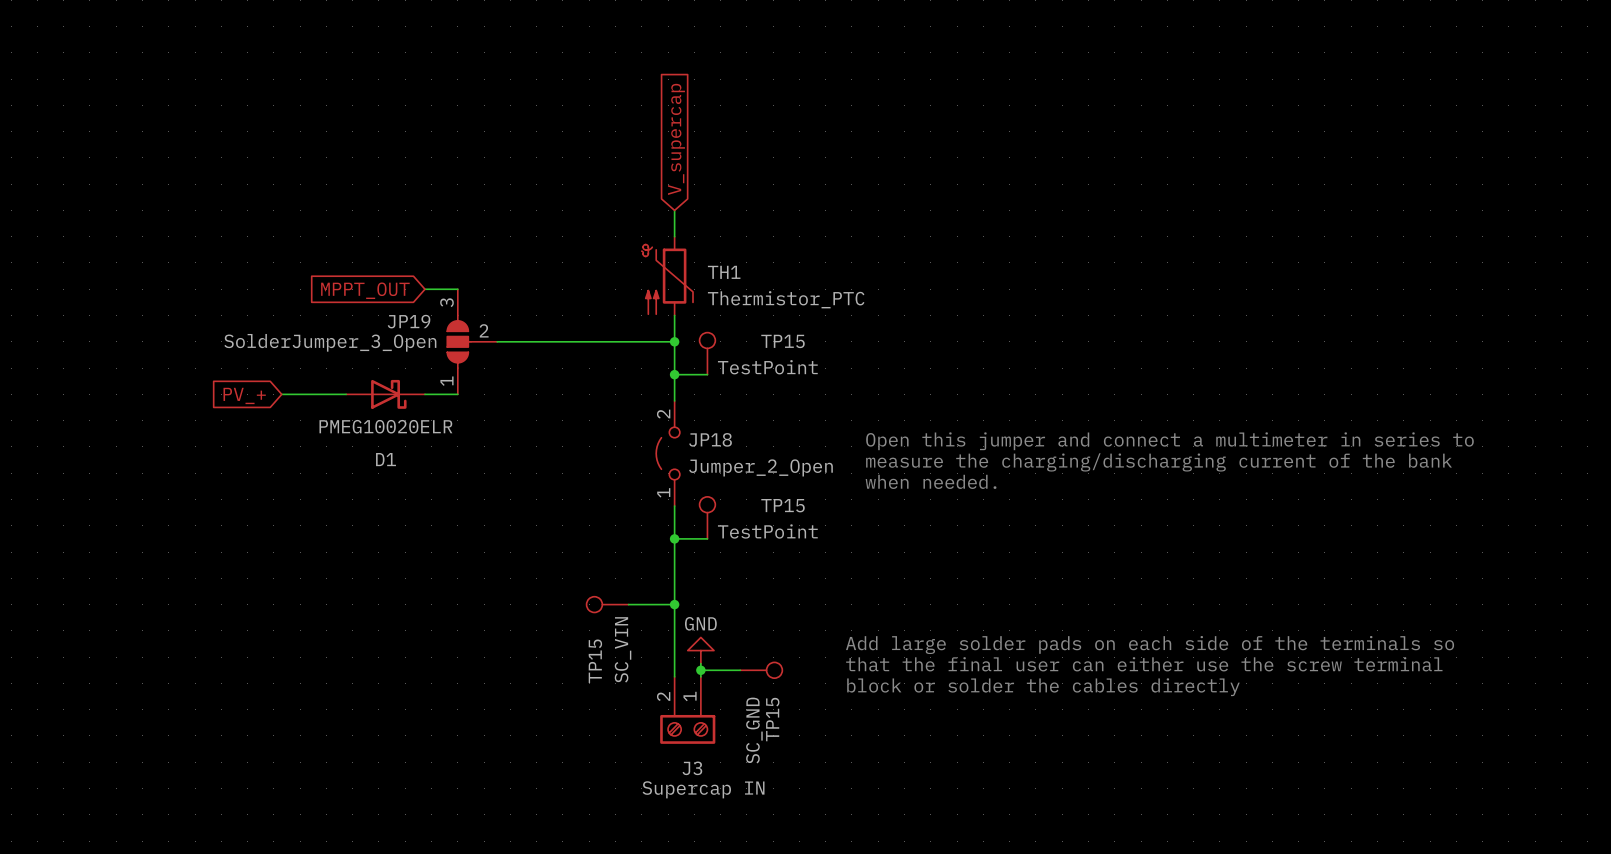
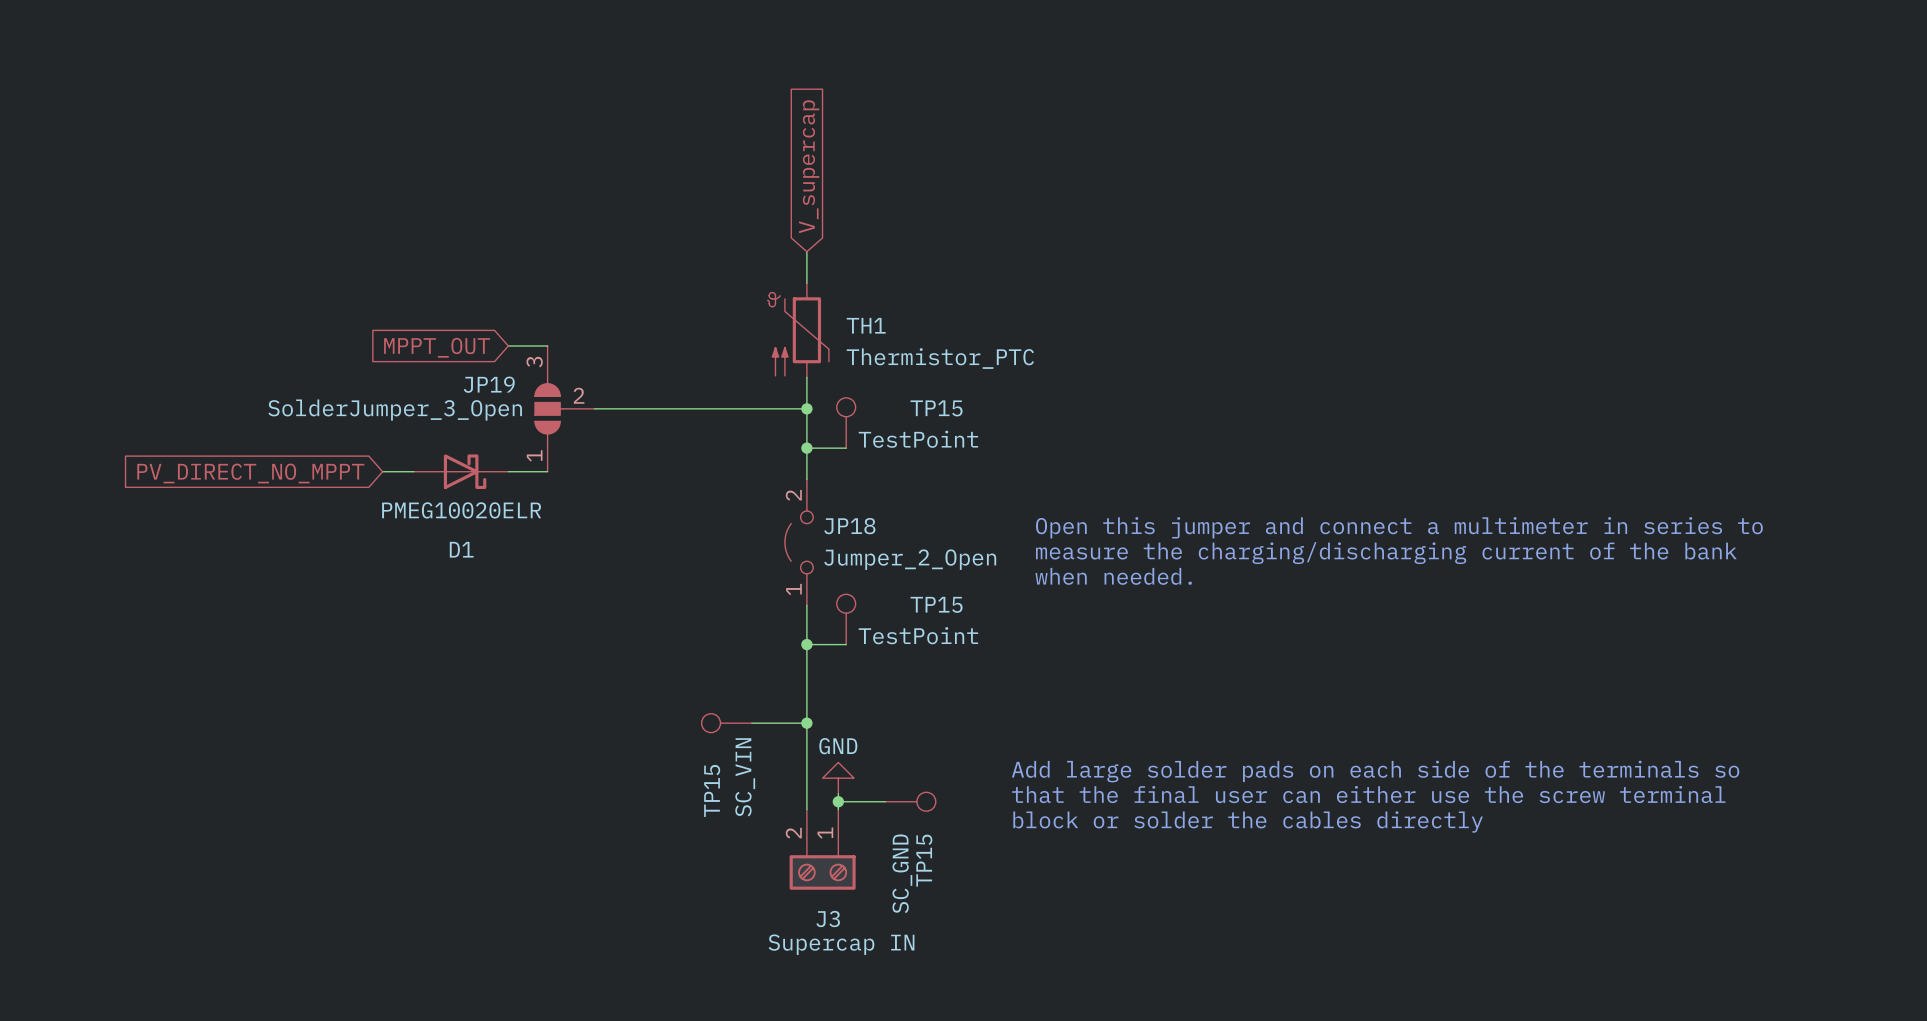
wire: (281, 394) (319, 394) -> none
global label: none -> PV_DIRECT_NO_MPPT (250, 473)
global label: PV_+ (244, 395) -> none

